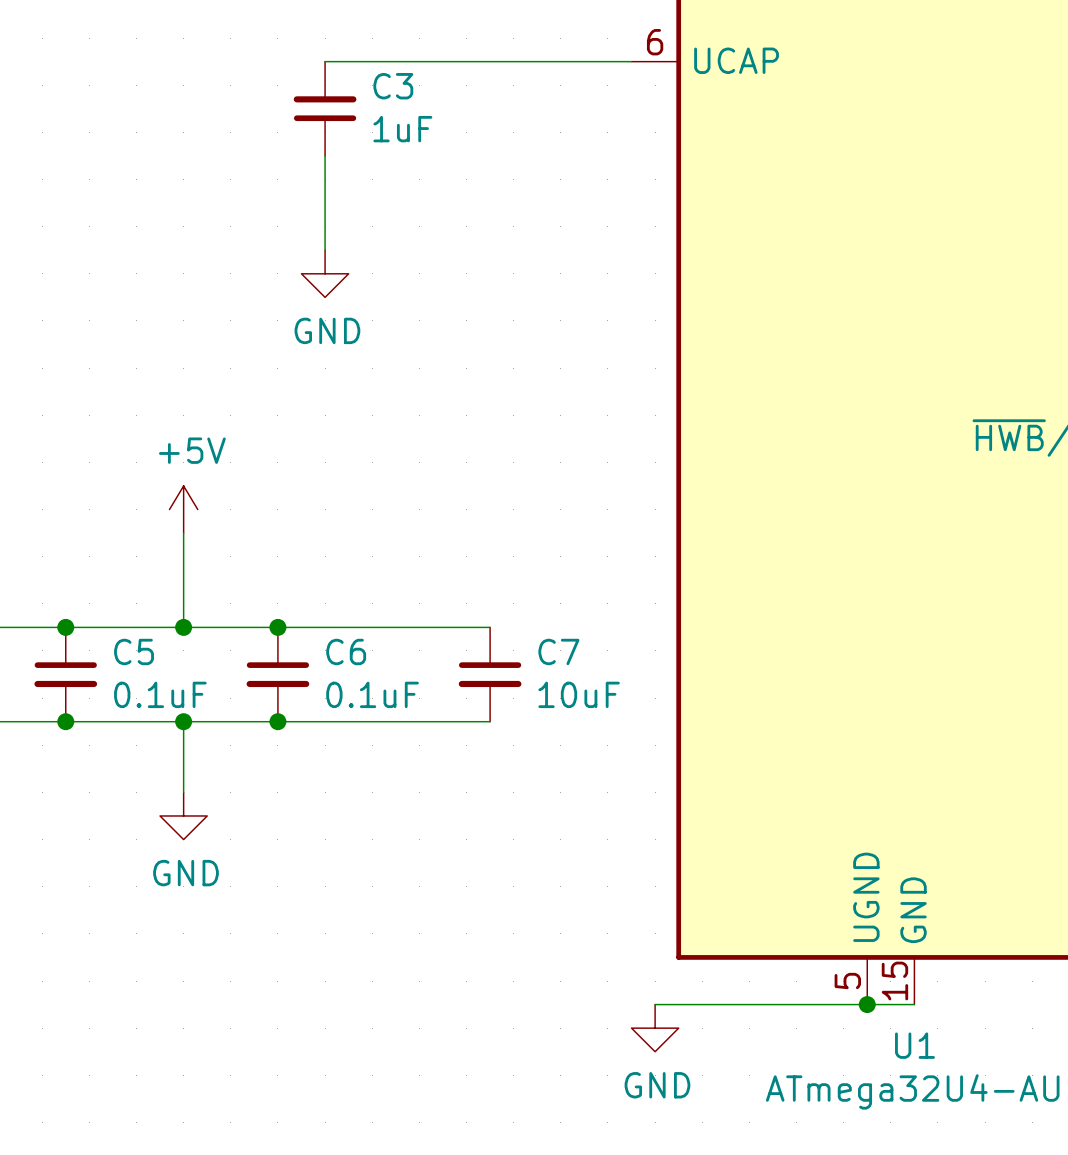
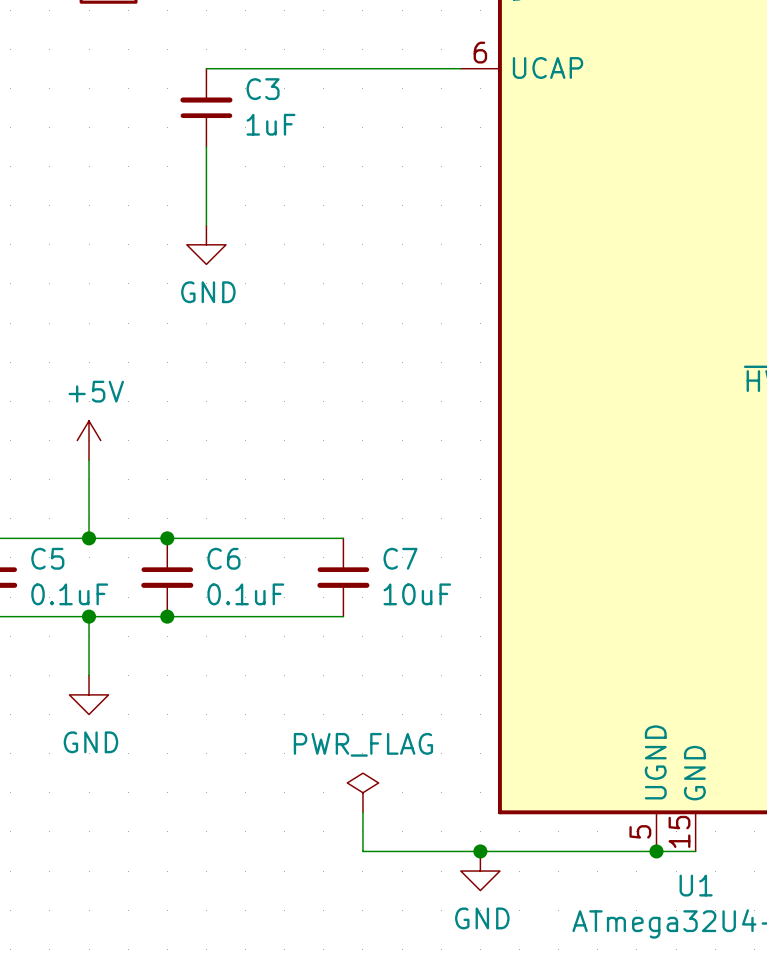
power symbol: none -> PWR_FLAG (362, 792)
wire: none -> (362, 812) (362, 851) (480, 851)
junction: none -> (480, 851)

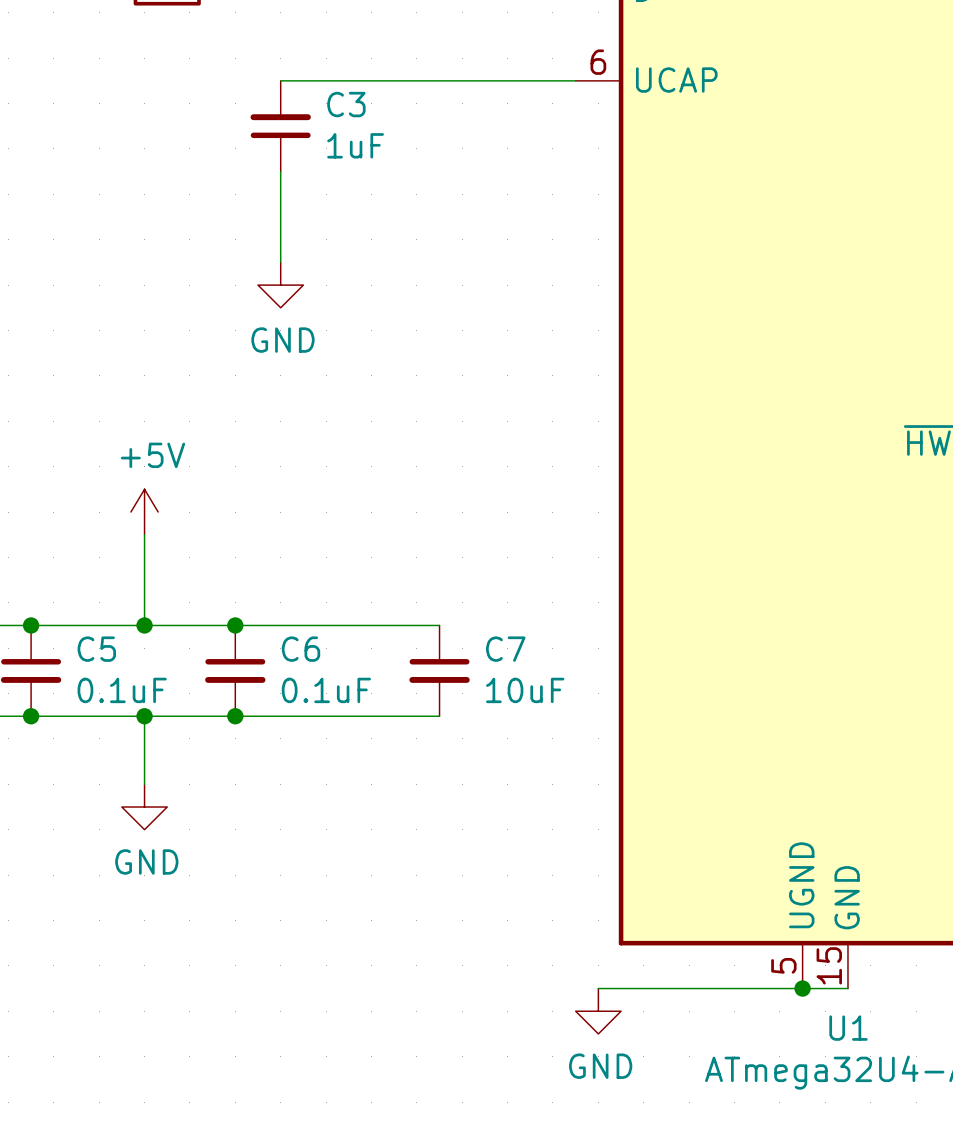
power symbol: PWR_FLAG (362, 792) -> none
wire: (362, 812) (362, 851) (480, 851) -> none
junction: (480, 851) -> none

